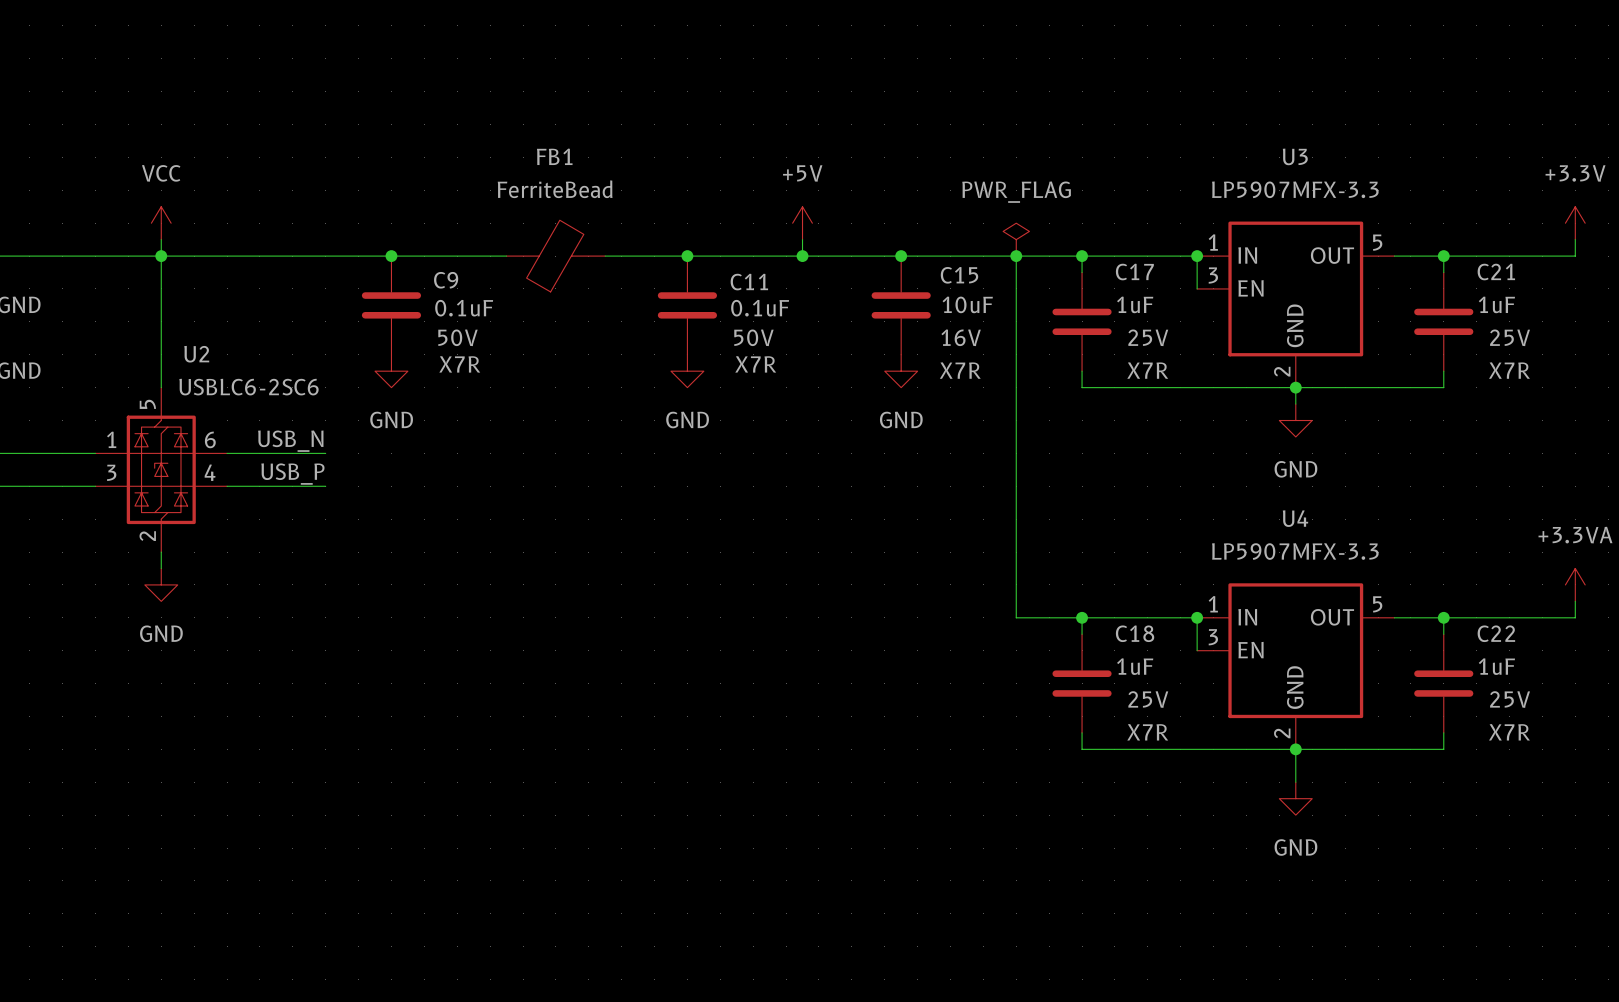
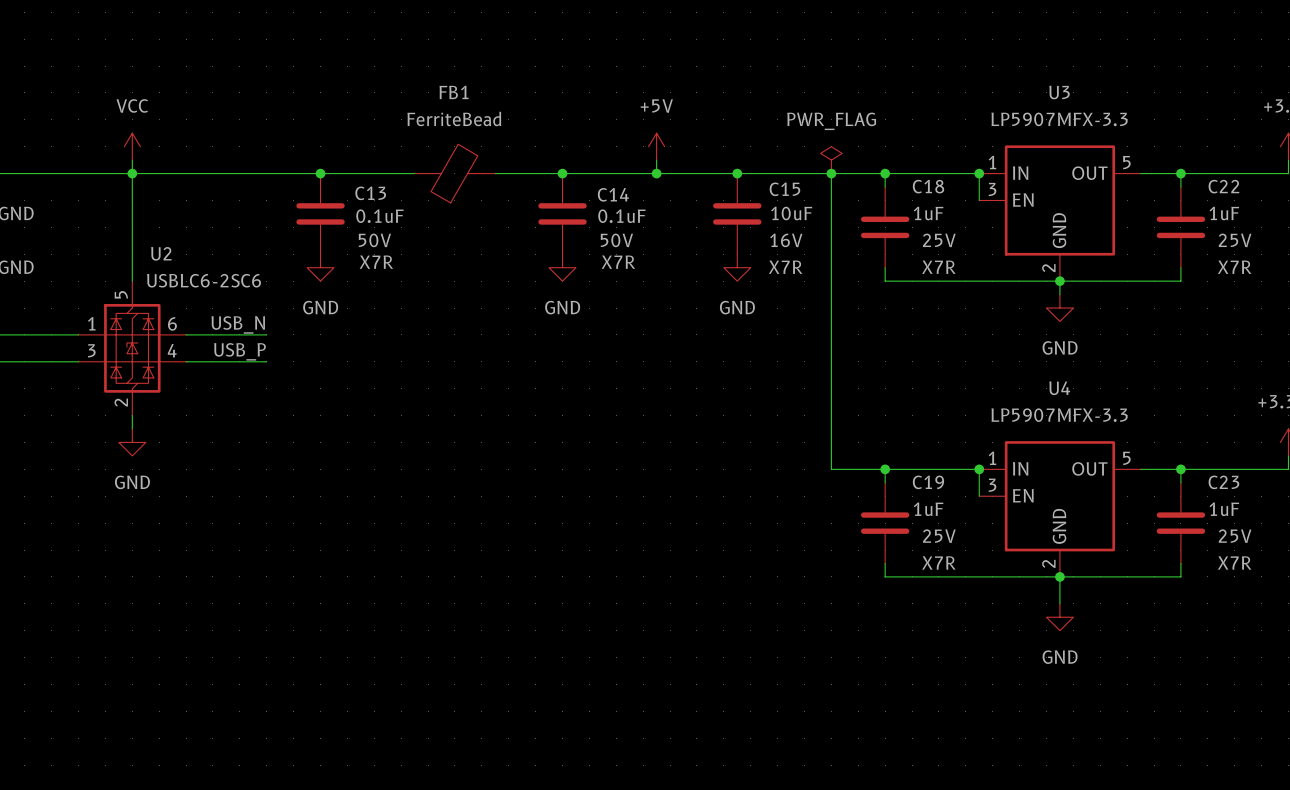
C17 name: C17 (1134, 272) -> C18 (928, 186)
C21 name: C21 (1496, 272) -> C22 (1223, 186)
C9 name: C9 (446, 280) -> C13 (370, 193)
C11 name: C11 (749, 282) -> C14 (613, 194)
C18 name: C18 (1135, 633) -> C19 (928, 482)
C22 name: C22 (1496, 633) -> C23 (1223, 482)

